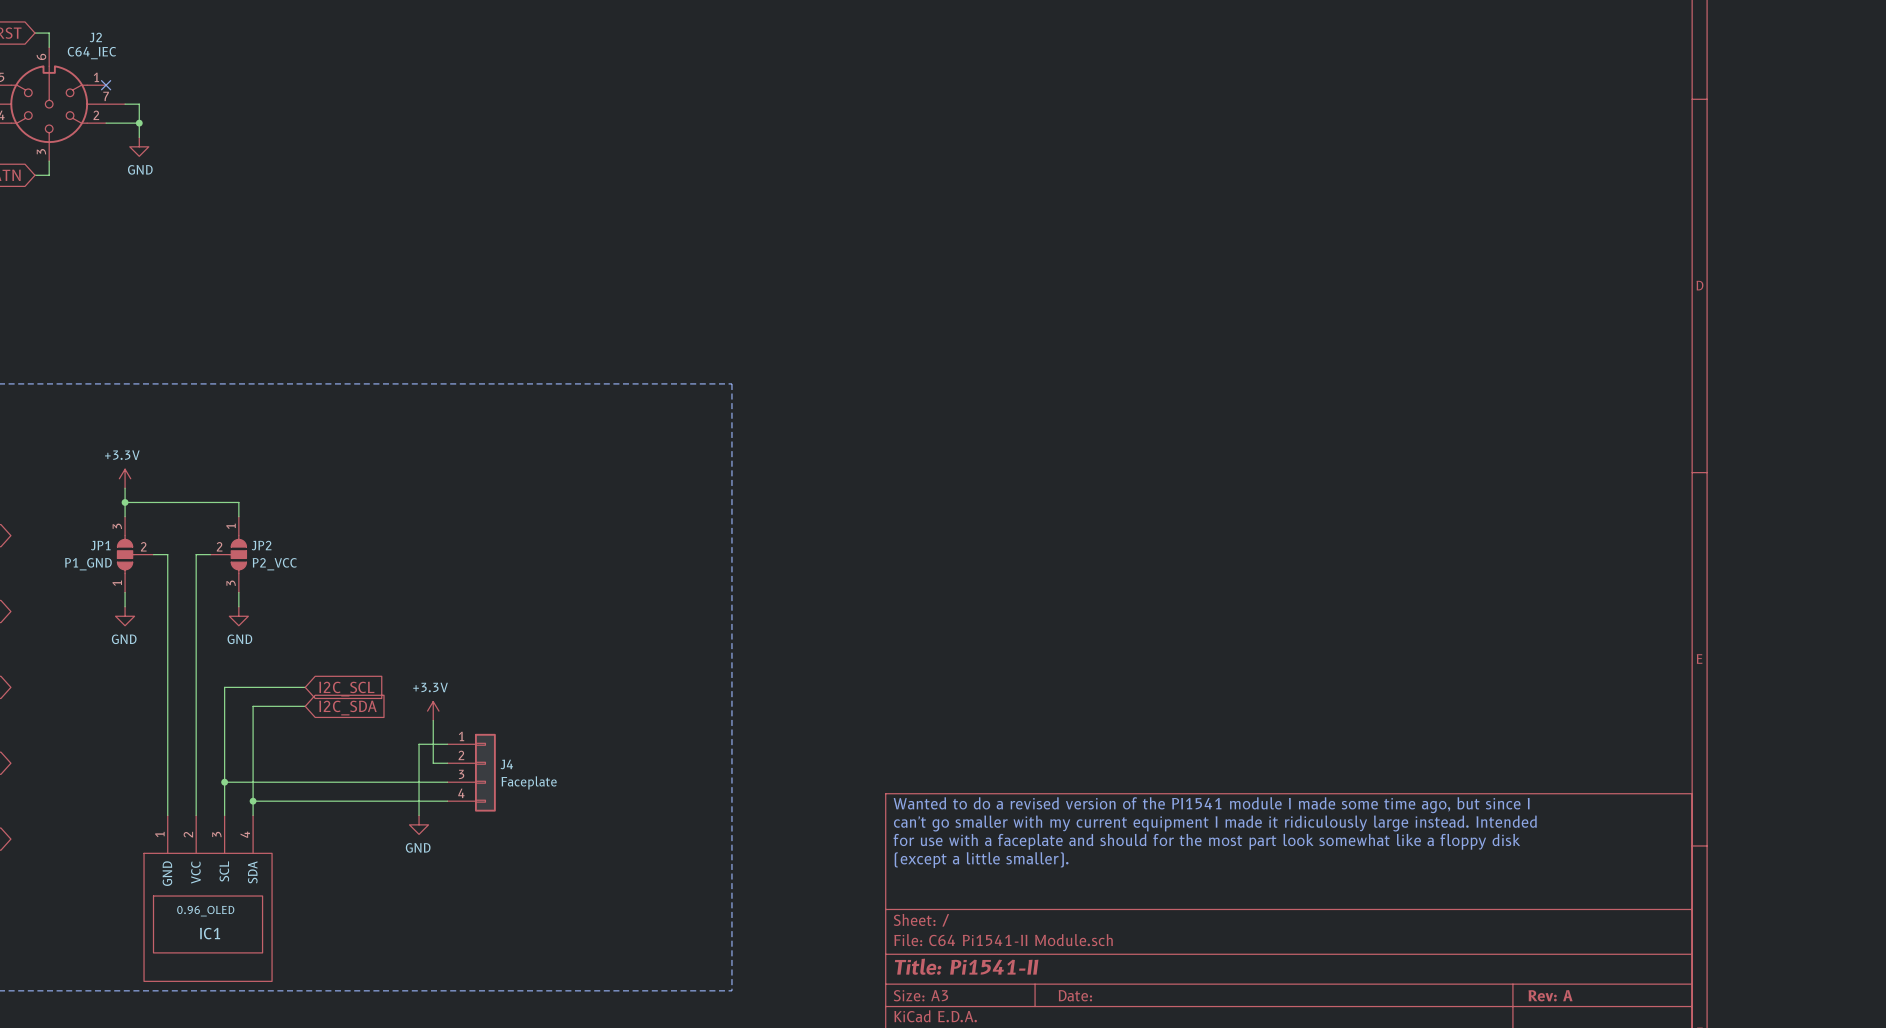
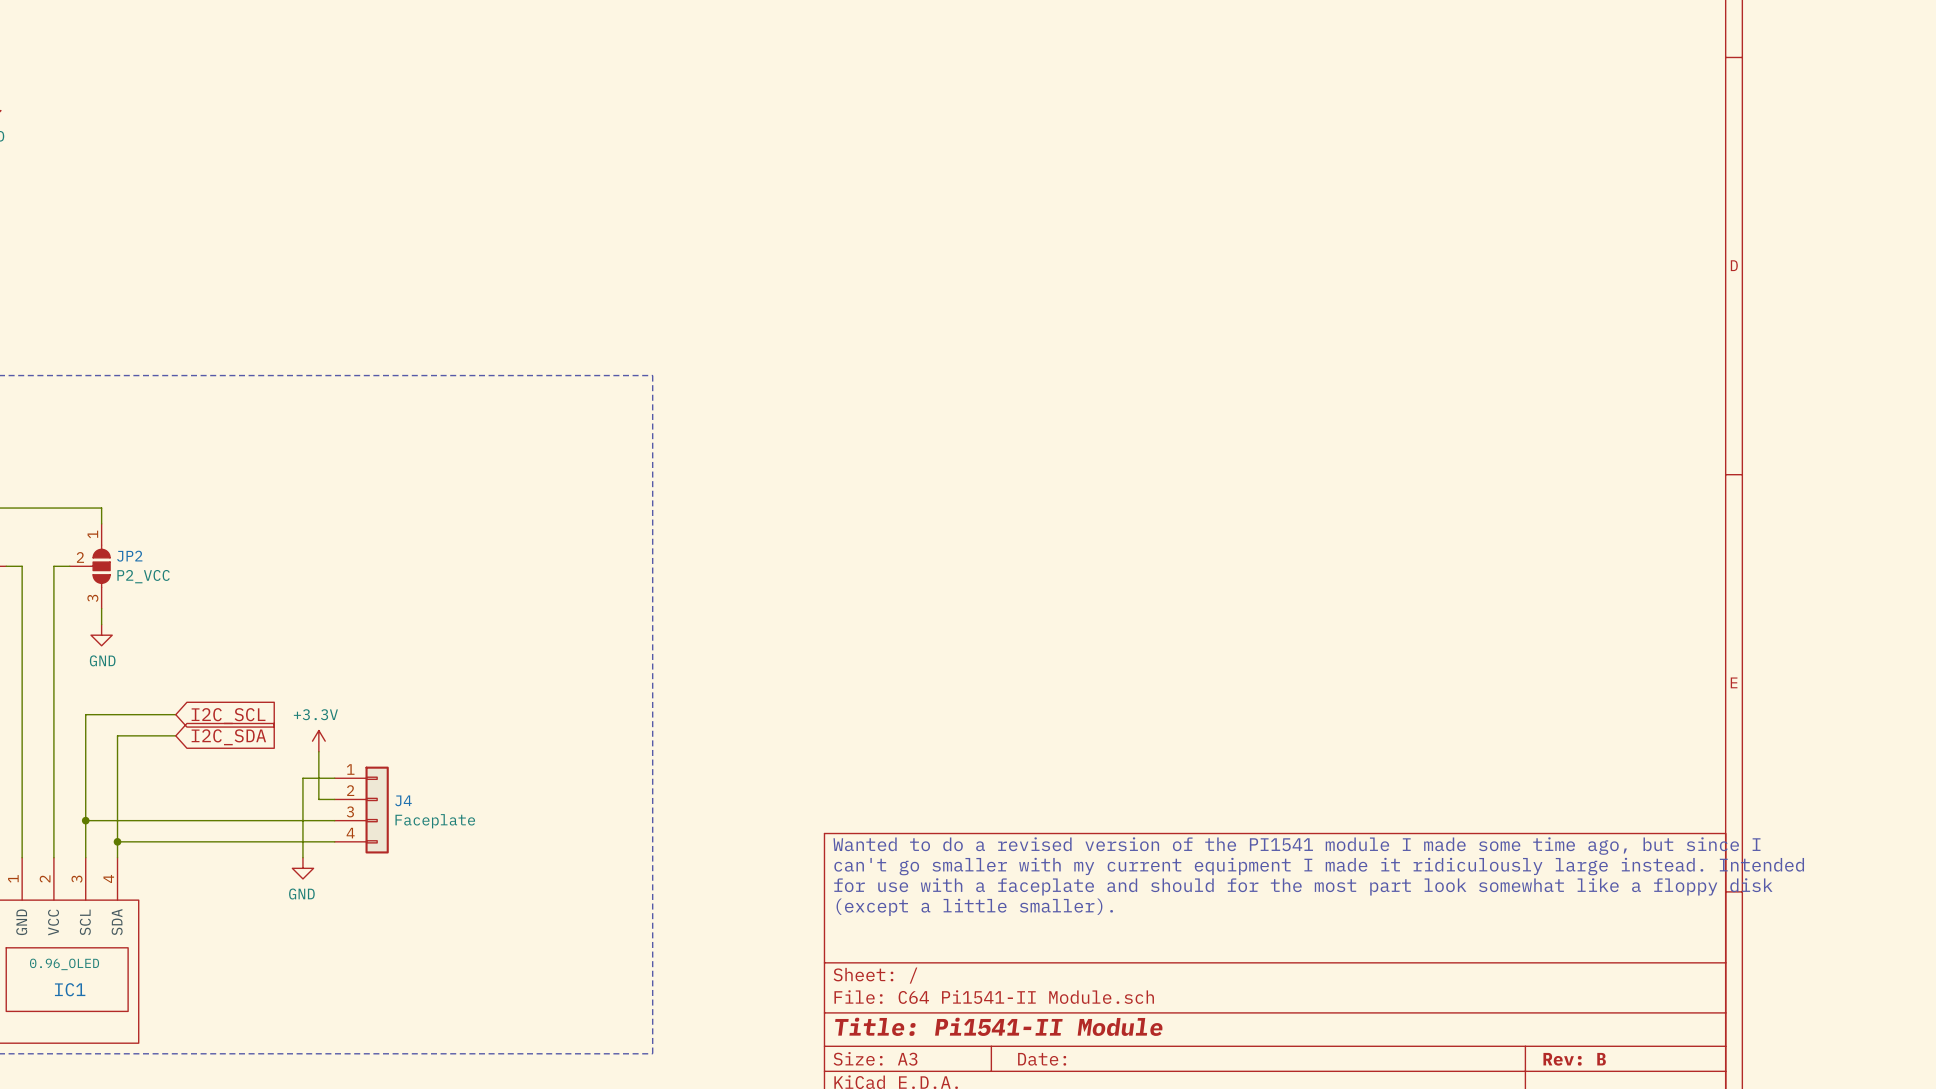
title block: Title: Pi1541-II (966, 966) -> Title: Pi1541-II Module (998, 1026)
title block: Rev: A (1550, 995) -> Rev: B (1574, 1059)

